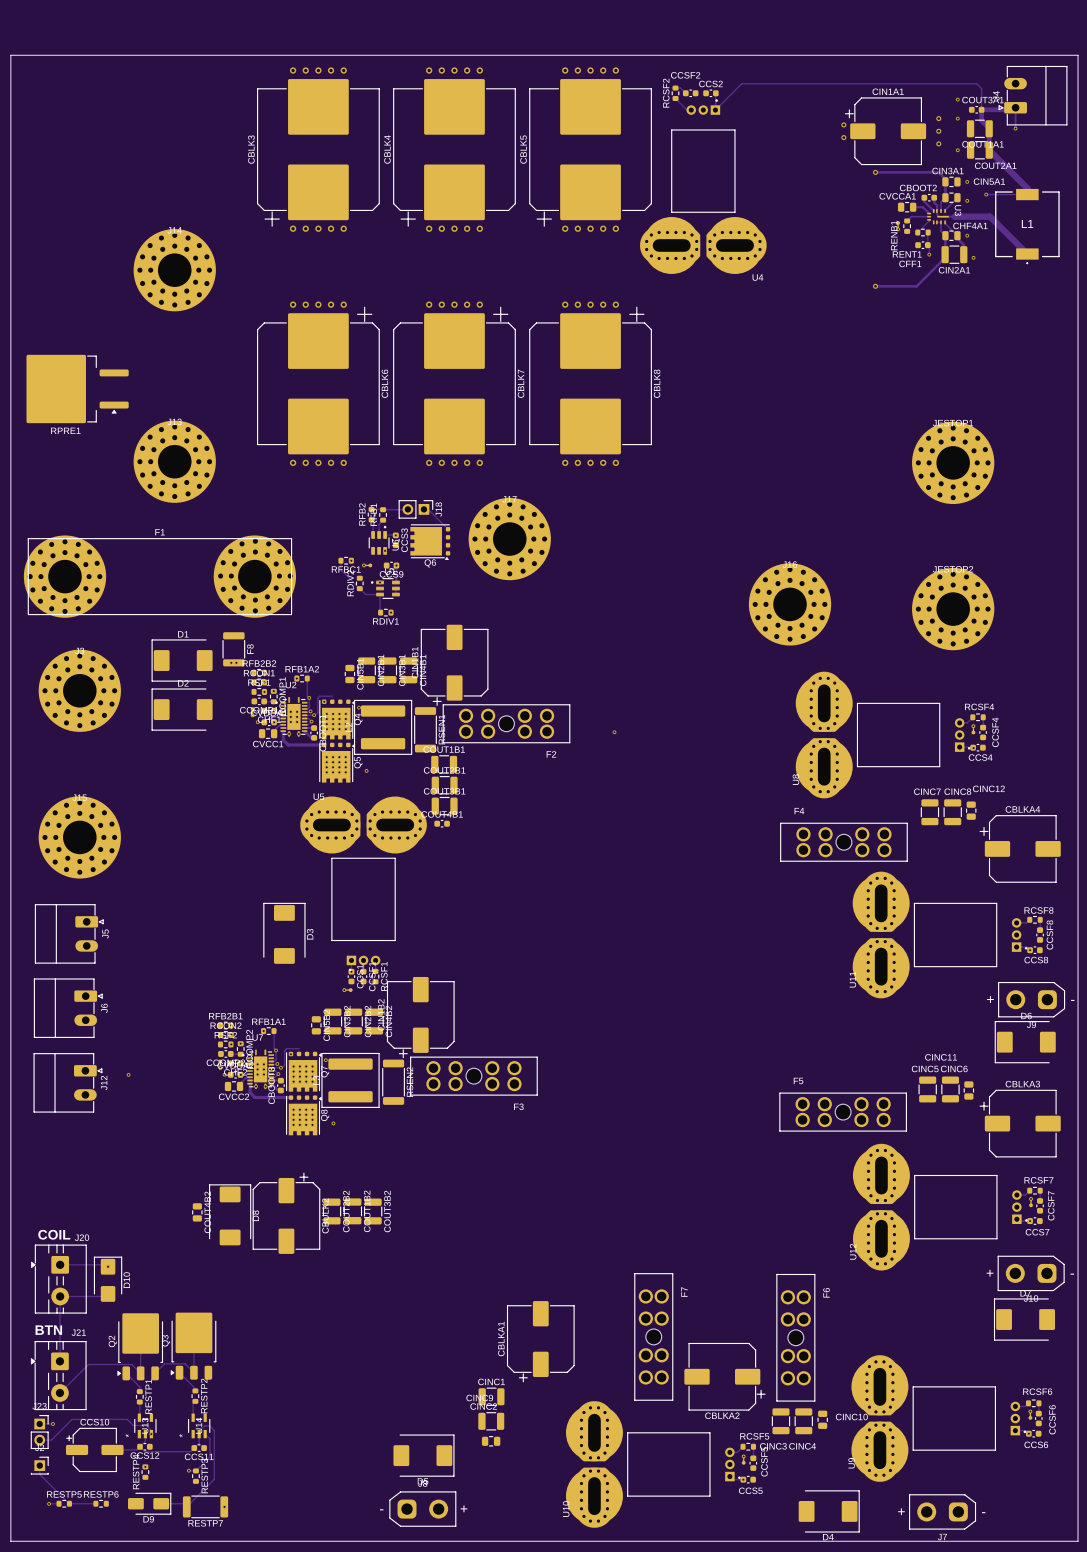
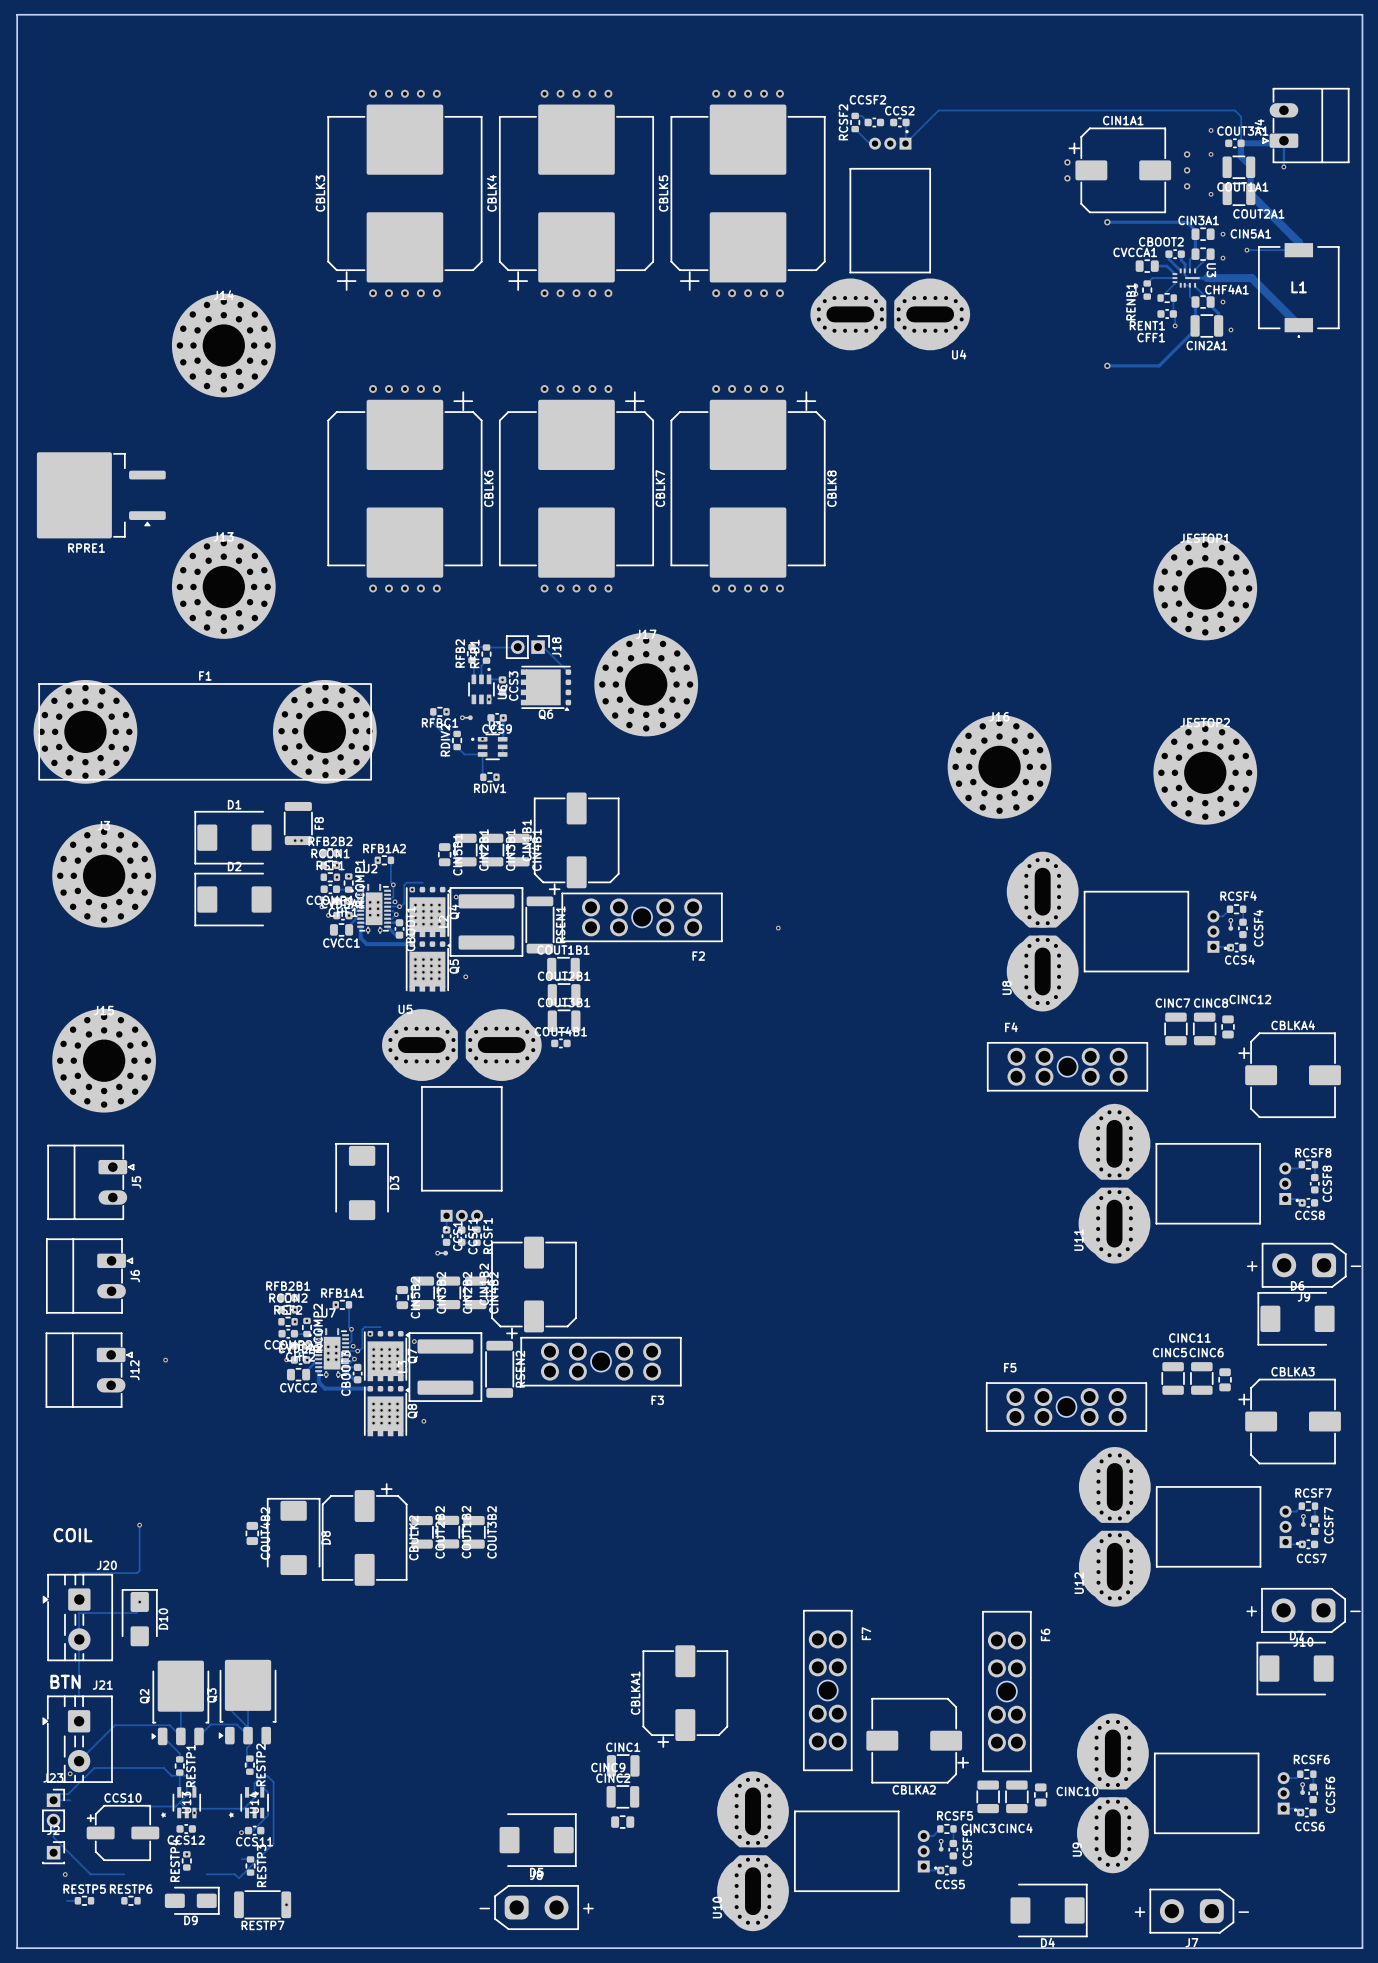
board edge: (10, 55) (1078, 55) (1077, 1541) -> (17, 74) (17, 14) (1362, 14) (1362, 1948)
track: none -> (139, 1525) (139, 1570) (137, 1573) (79, 1573)
via: none -> (139, 1525)
text position: COIL (54, 1234) -> COIL (73, 1535)
track: (60, 1264) (106, 1264) (108, 1266) -> none
track: (108, 1293) (105, 1296) (59, 1296) (59, 1361) -> (139, 1609) (136, 1613) (78, 1613) (78, 1694)
track: (179, 1372) (195, 1388) (195, 1390) -> (229, 1709) (249, 1729) (249, 1732)
track: (195, 1401) (193, 1403) (193, 1417) -> (249, 1745) (246, 1748) (246, 1765)
via position: (52, 1424) -> (70, 1773)
track: (145, 1434) (145, 1441) (136, 1449) (112, 1449) -> (186, 1786) (186, 1795) (175, 1806) (145, 1806)
track: (151, 1434) (151, 1430) (146, 1425) (133, 1425) (127, 1419) (72, 1419) (51, 1440) (39, 1440) -> (194, 1786) (194, 1782) (187, 1775) (171, 1775) (163, 1768) (94, 1768) (68, 1794) (53, 1794)
track: (205, 1434) (209, 1438) (209, 1457) (196, 1470) -> (262, 1786) (268, 1792) (268, 1815) (250, 1832)
track: (140, 1446) (144, 1451) (190, 1451) (199, 1443) (199, 1431) (204, 1425) (209, 1425) (214, 1430) (214, 1479) (186, 1506) (183, 1503) (161, 1503) -> (179, 1802) (186, 1808) (243, 1808) (254, 1797) (254, 1783) (261, 1776) (267, 1776) (273, 1782) (273, 1843) (238, 1878) (234, 1874) (206, 1874)
track: (39, 1465) (39, 1474) (69, 1503) (95, 1503) -> (53, 1826) (53, 1837) (90, 1874) (124, 1874)
via position: (188, 1470) -> (241, 1832)
via position: (49, 1503) -> (65, 1874)

